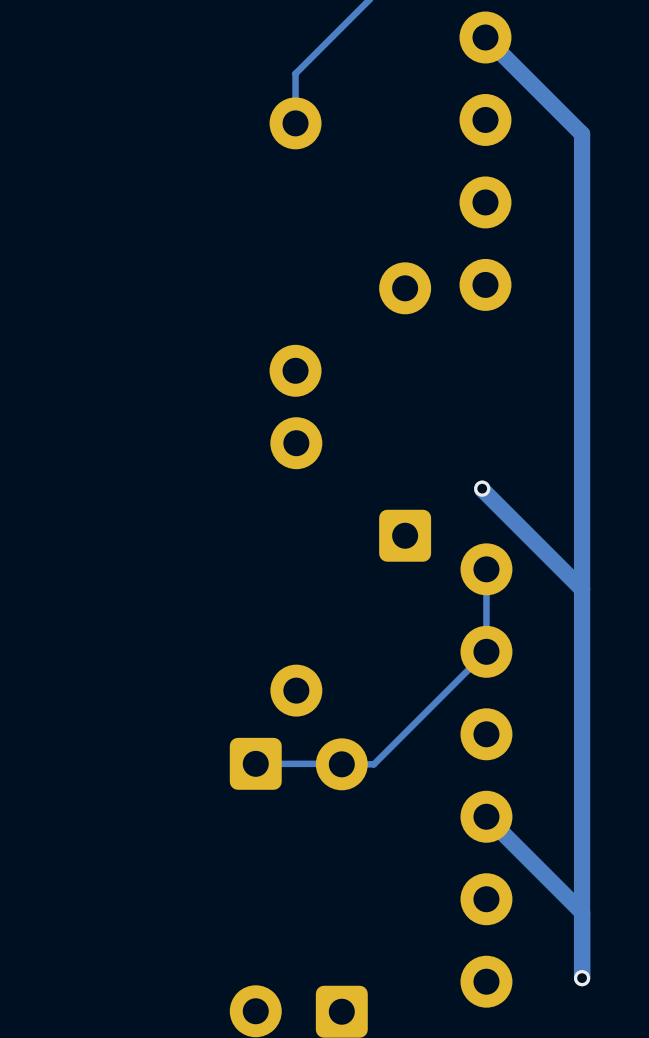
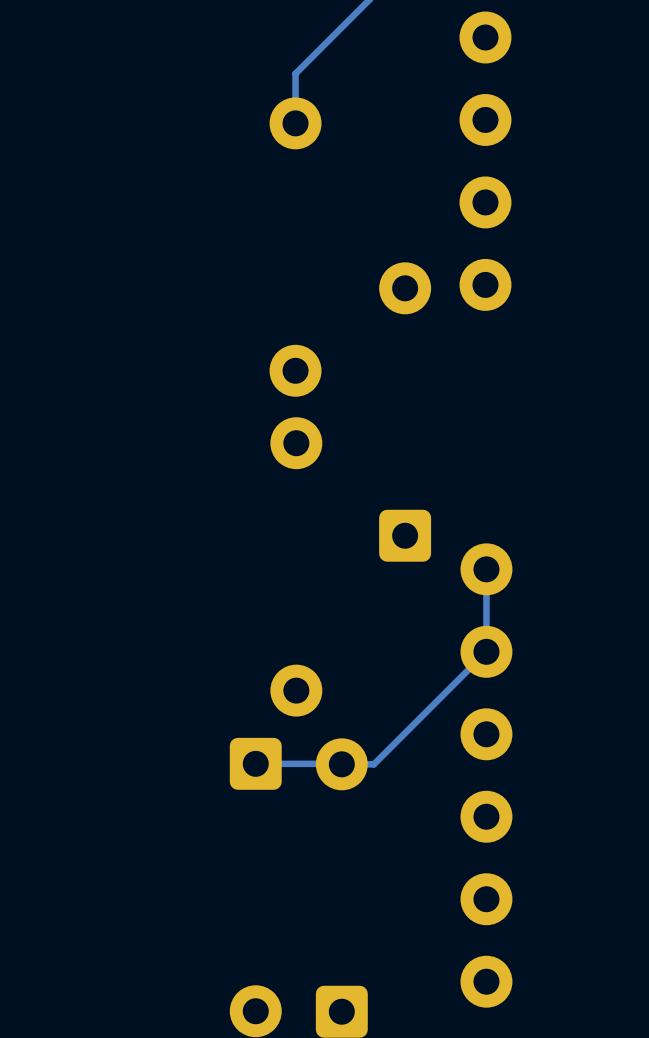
track: (485, 37) (582, 134) (582, 978) -> none
track: (482, 488) (582, 589) -> none
via: (482, 488) -> none
track: (486, 816) (582, 912) -> none
via: (582, 978) -> none

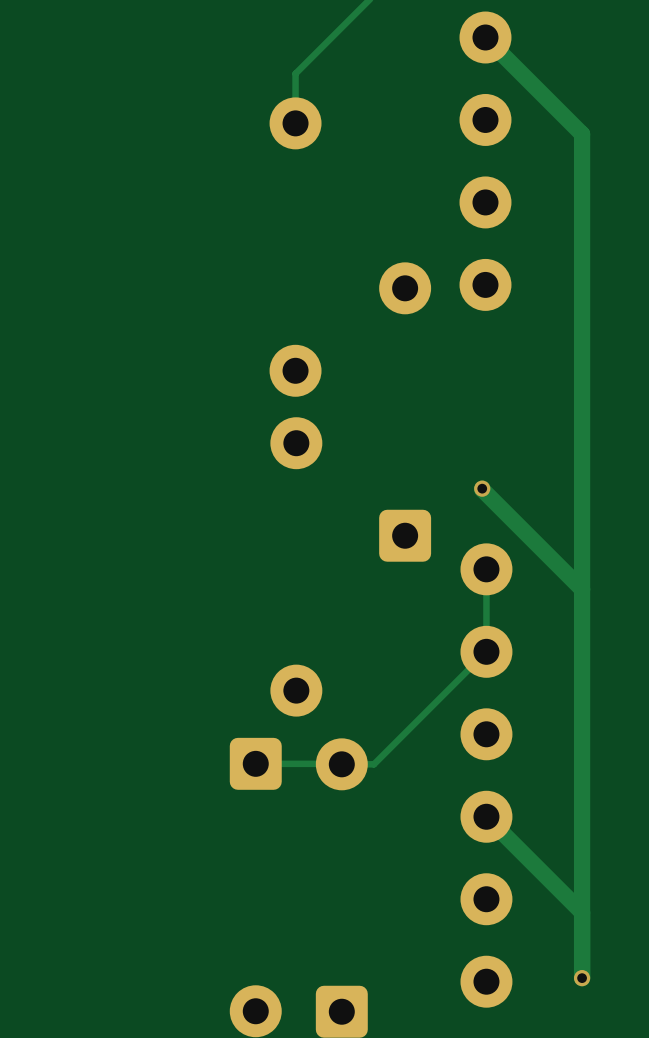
track: none -> (485, 37) (582, 134) (582, 978)
track: none -> (482, 488) (582, 589)
via: none -> (482, 488)
track: none -> (486, 816) (582, 912)
via: none -> (582, 978)

